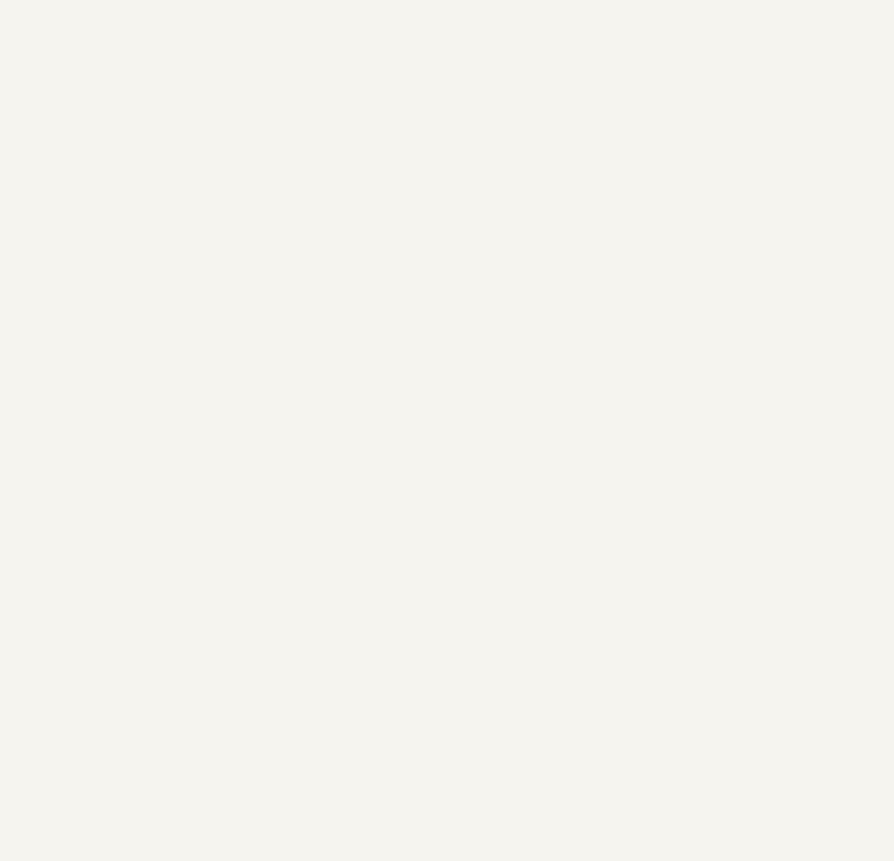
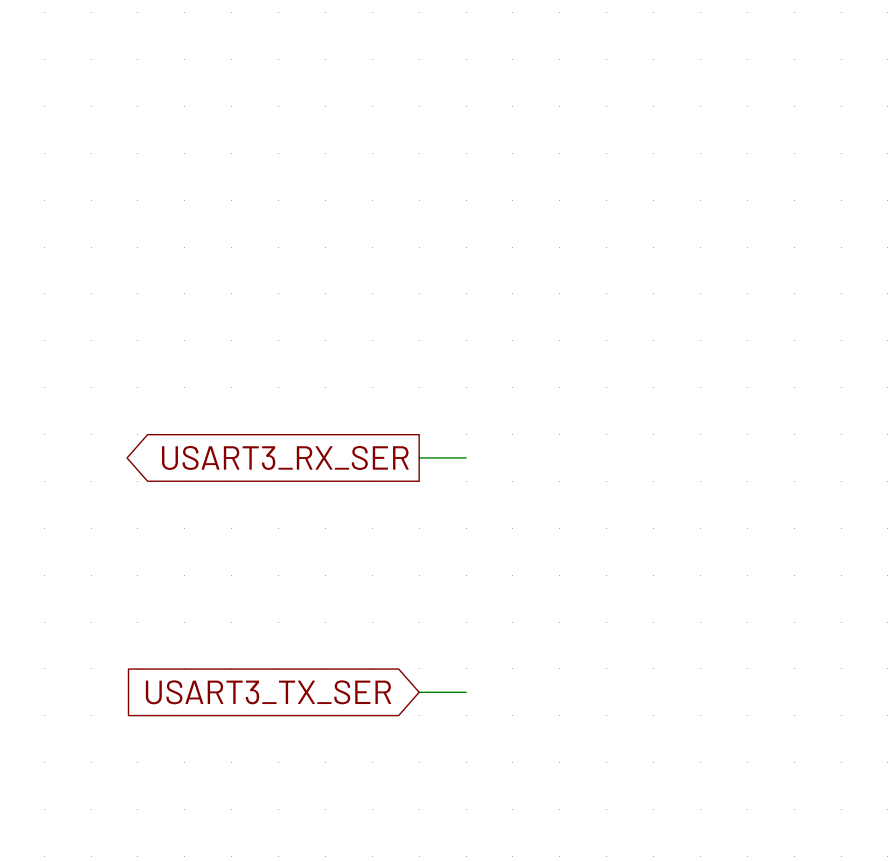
wire: none -> (419, 457) (466, 457)
global label: none -> USART3_RX_SER (285, 457)
wire: none -> (419, 692) (466, 692)
global label: none -> USART3_TX_SER (268, 692)

